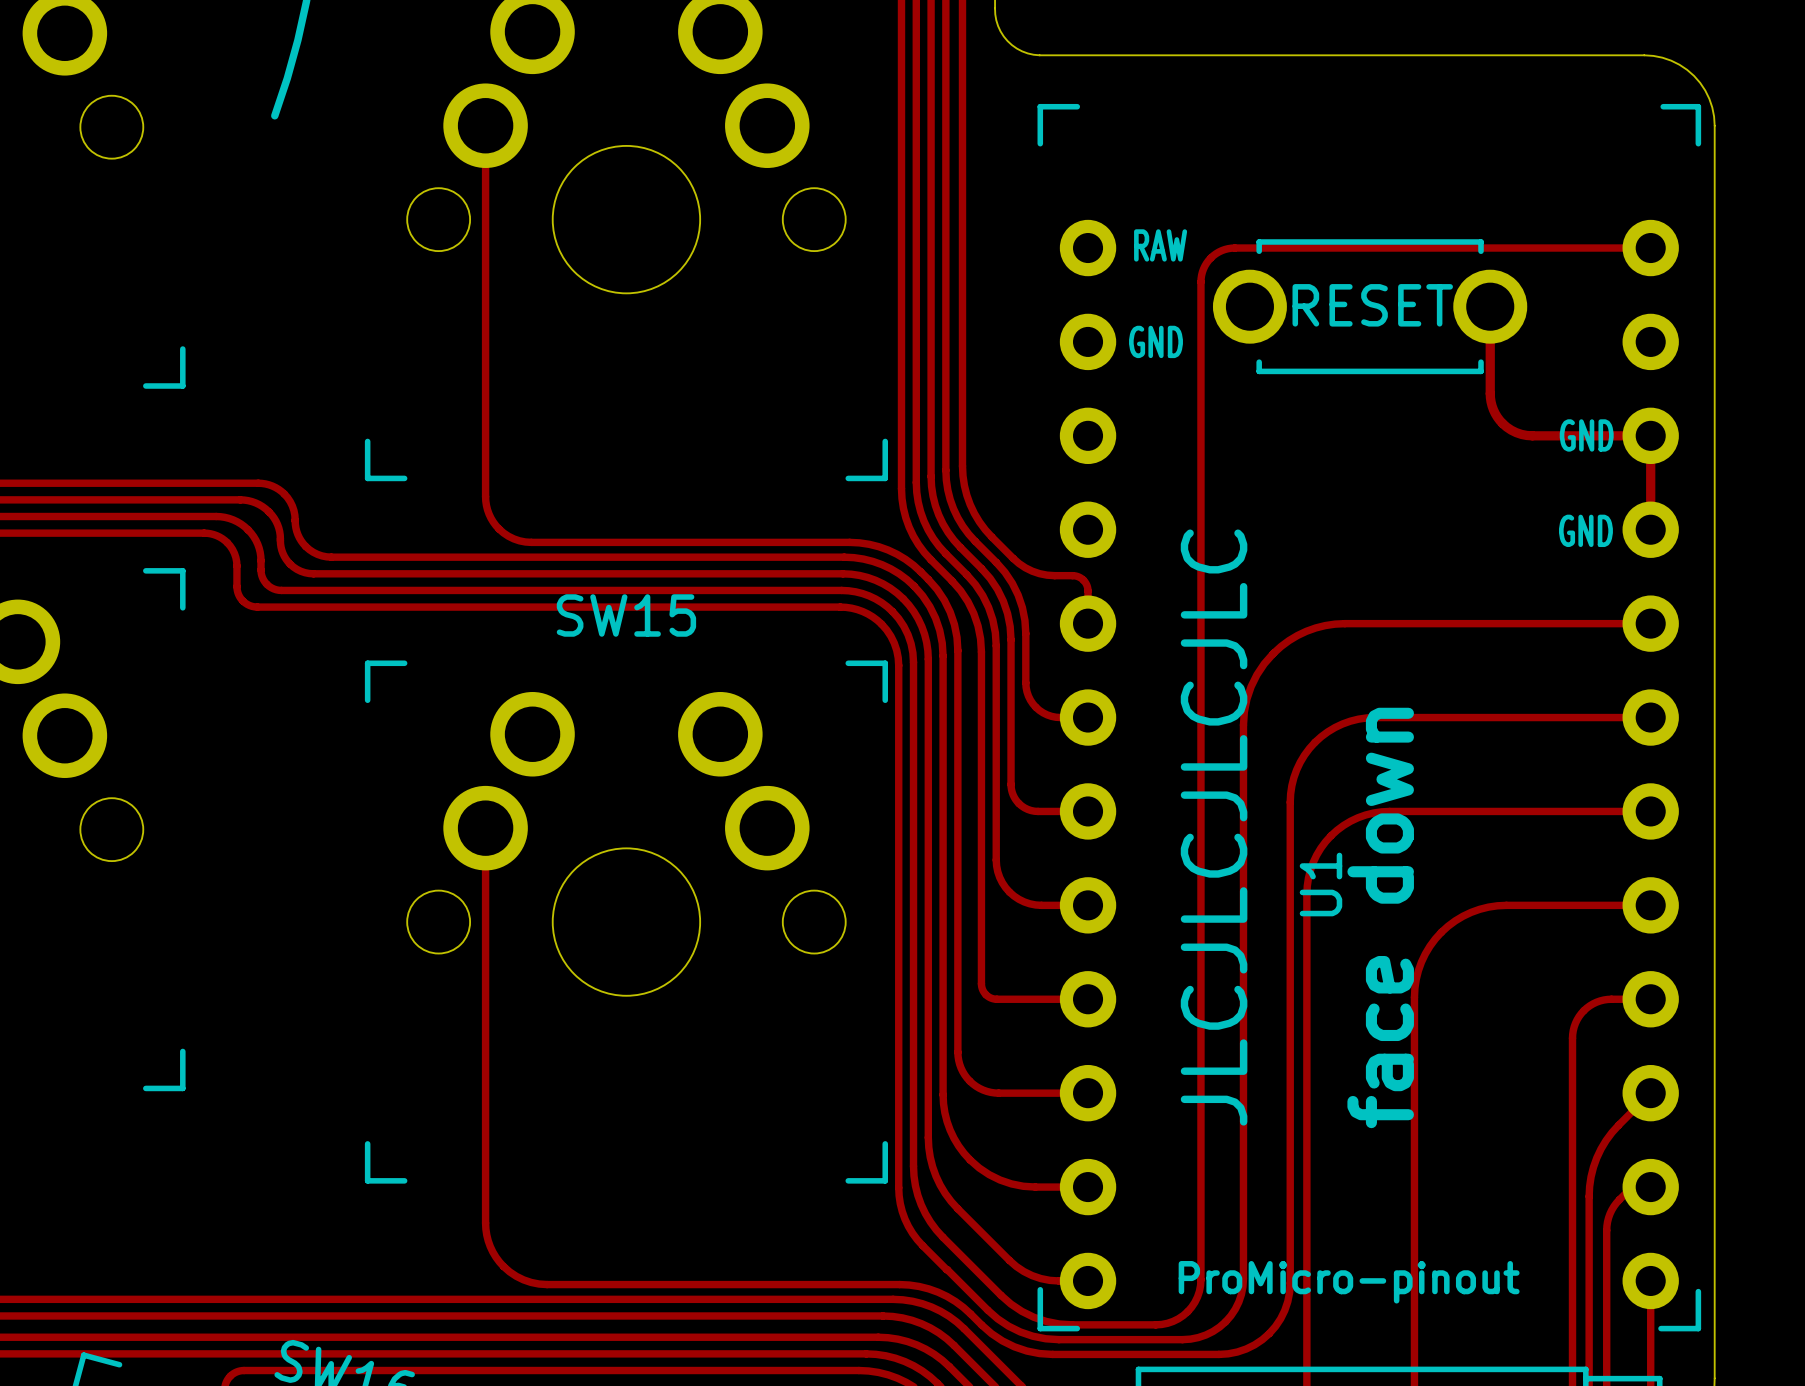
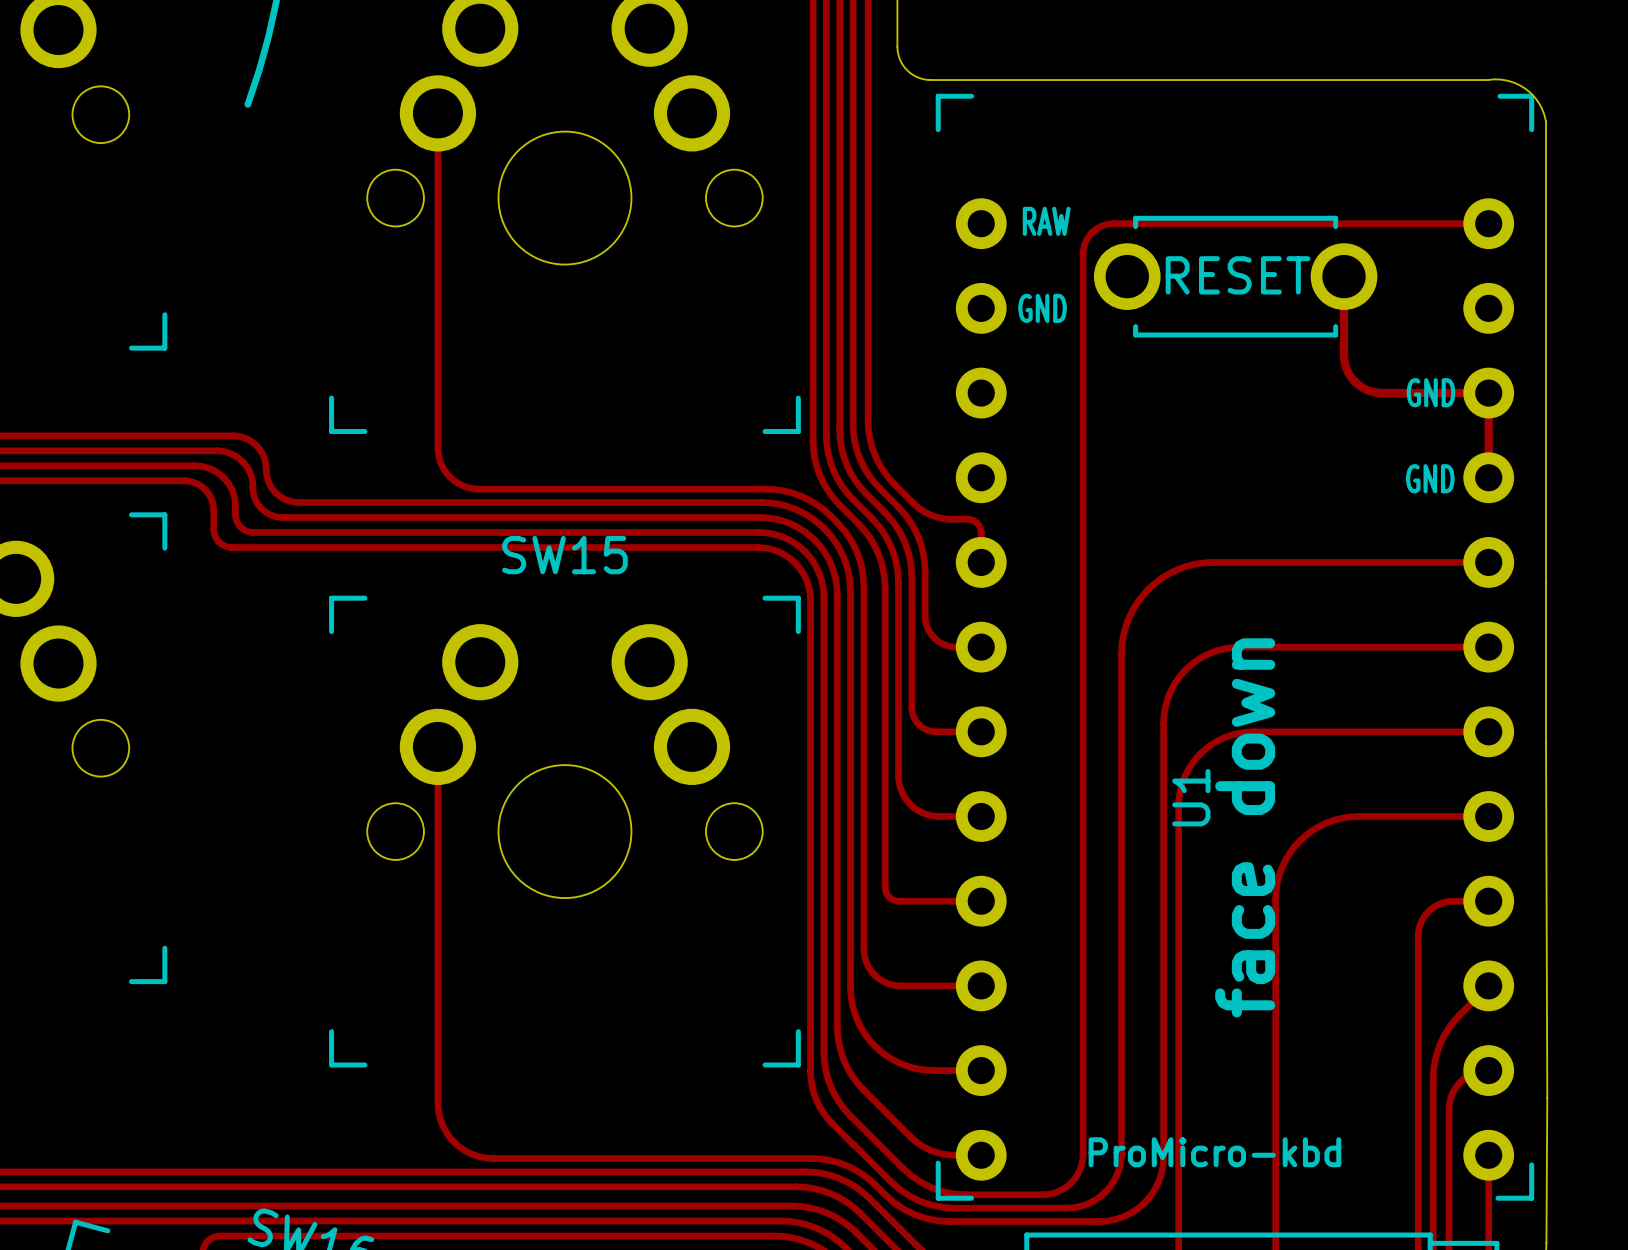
board edge: (995, 8) (998, 25) (1007, 41) (1022, 51) (1033, 54) (1644, 55) (1662, 57) (1679, 64) (1694, 75) (1705, 90) (1712, 107) (1714, 125) (1714, 1378) -> (897, 7) (899, 57) (909, 72) (927, 79) (1500, 79) (1513, 82) (1525, 88) (1535, 97) (1542, 109) (1546, 121) (1546, 1243)
text: JLCJLCJLCJLC (1214, 827) -> none
U1 value: ProMicro-pinout (1349, 1282) -> ProMicro-kbd (1214, 1152)

